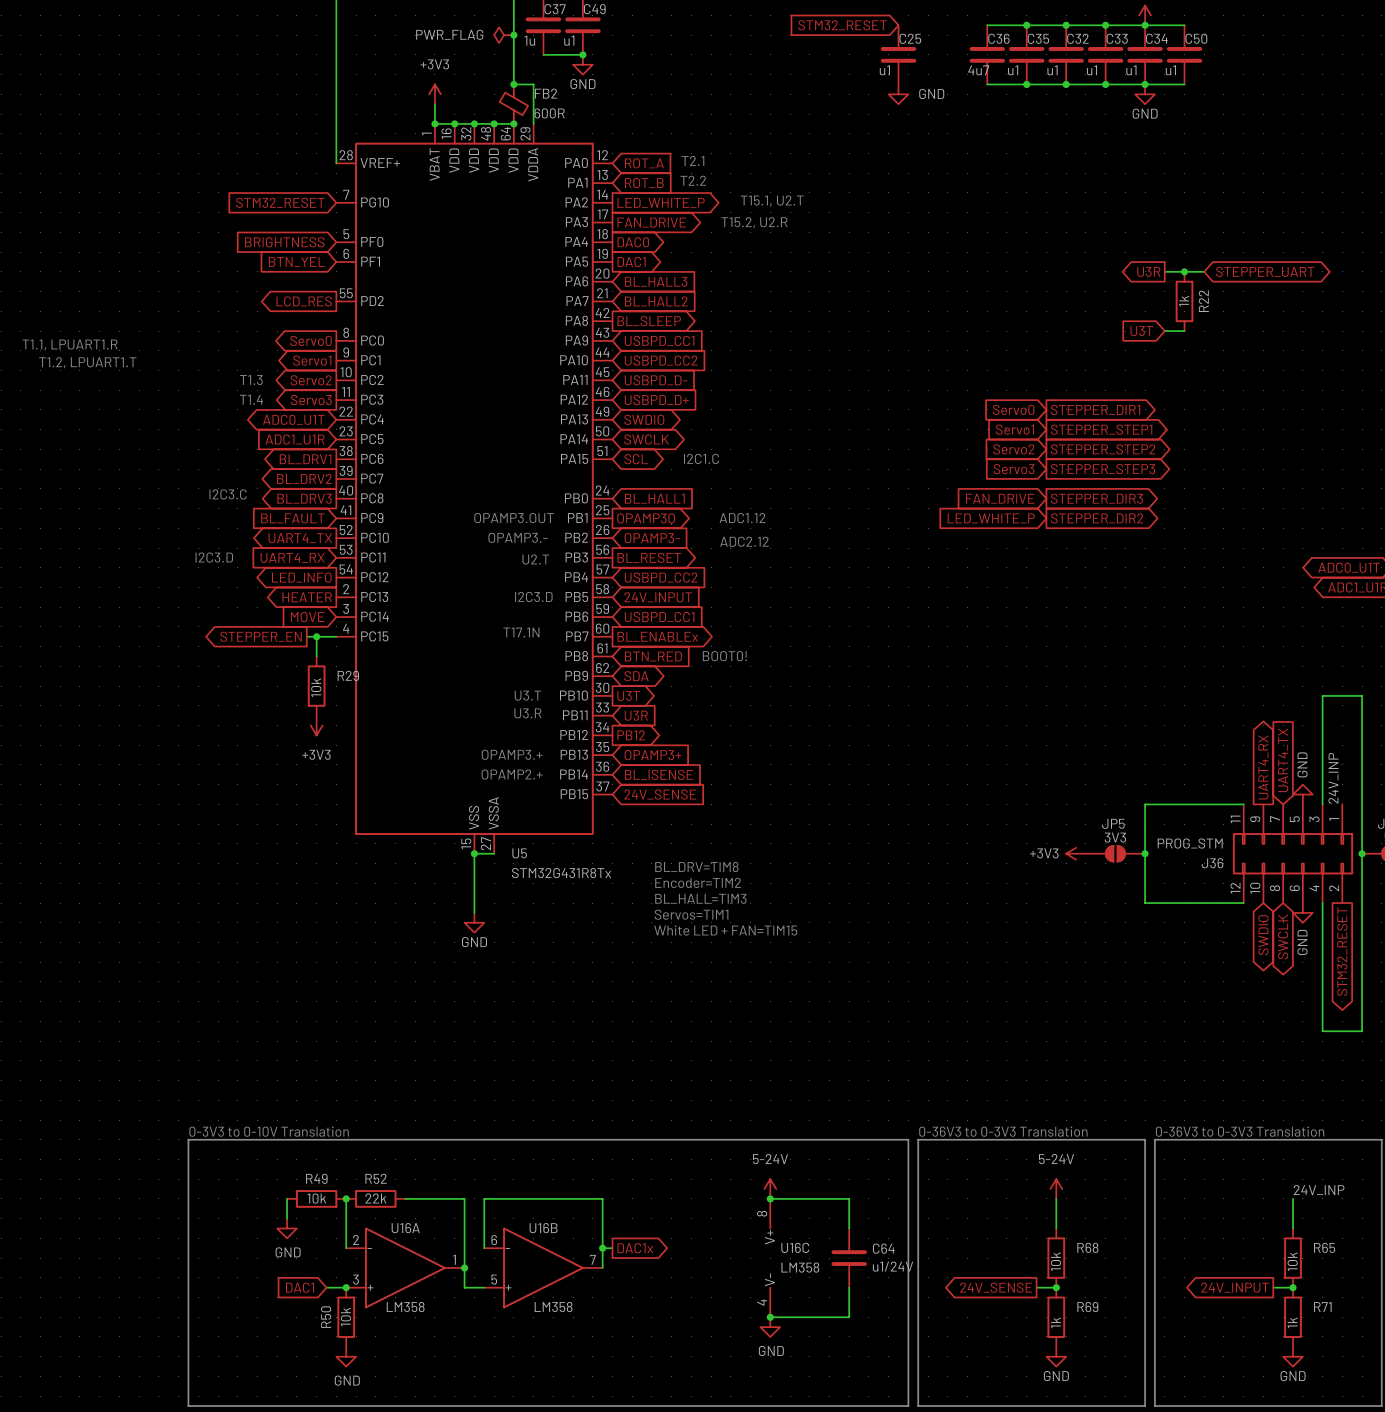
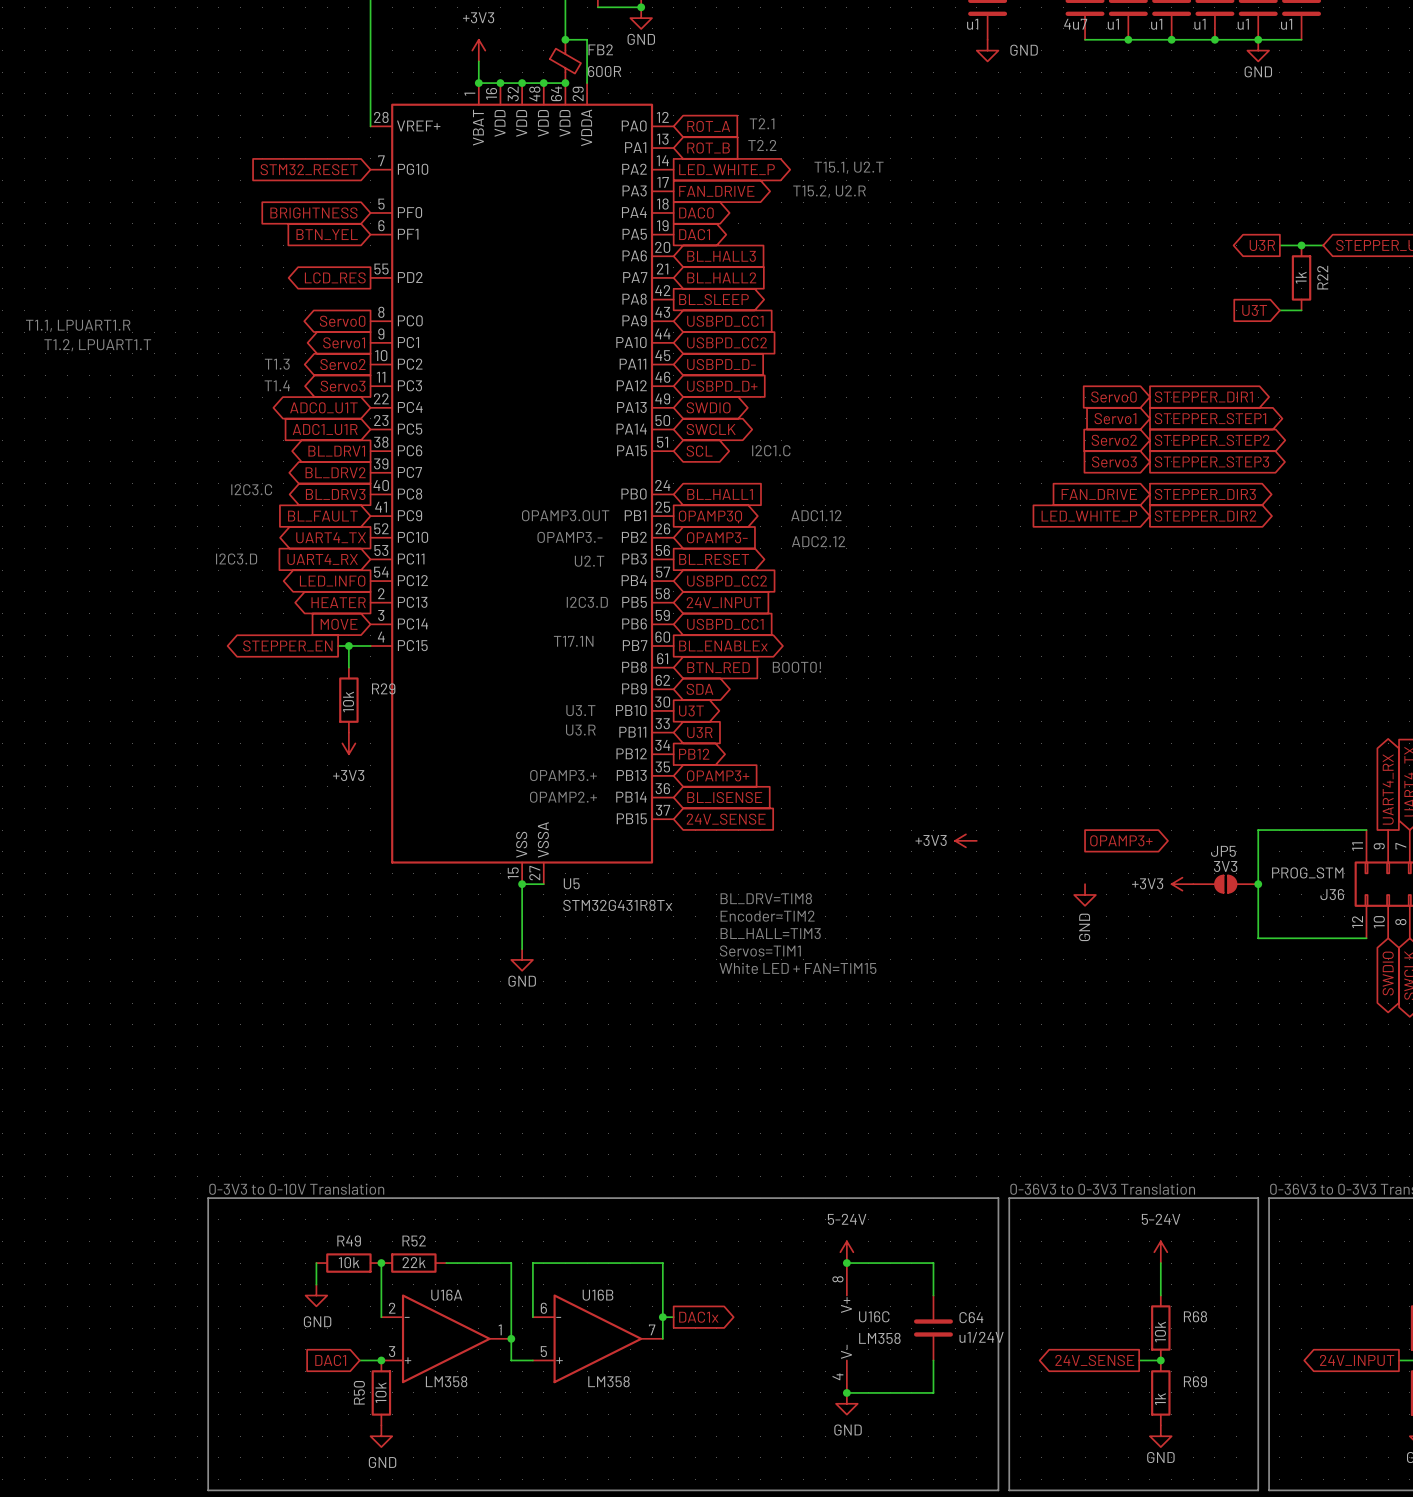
power symbol: none -> +3V3 (965, 840)
global label: none -> OPAMP3+ (1121, 840)
power symbol: none -> GND (1085, 894)

